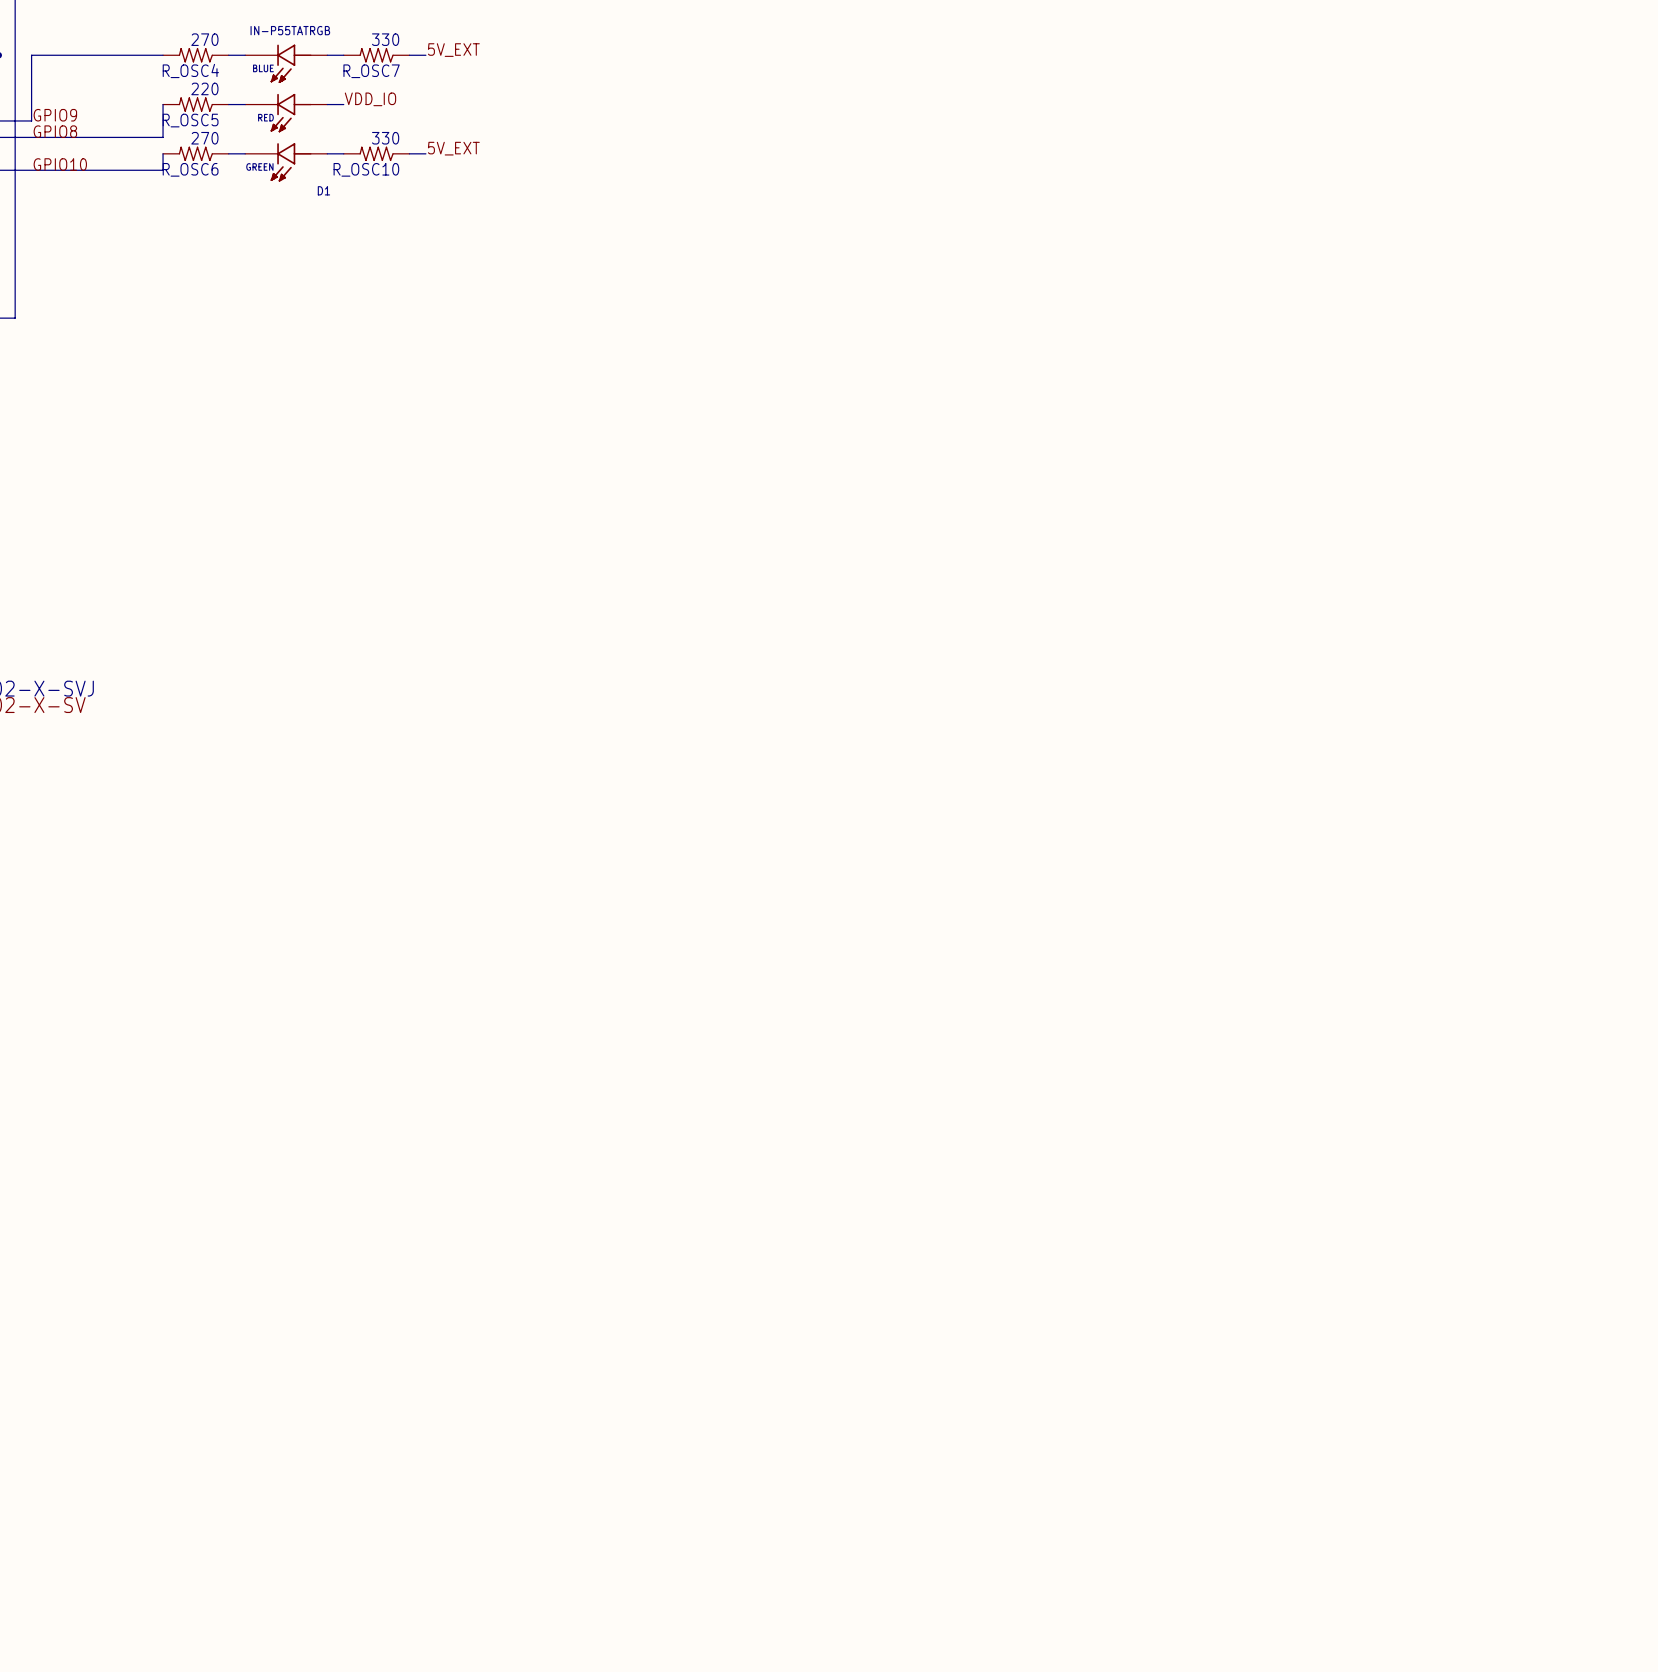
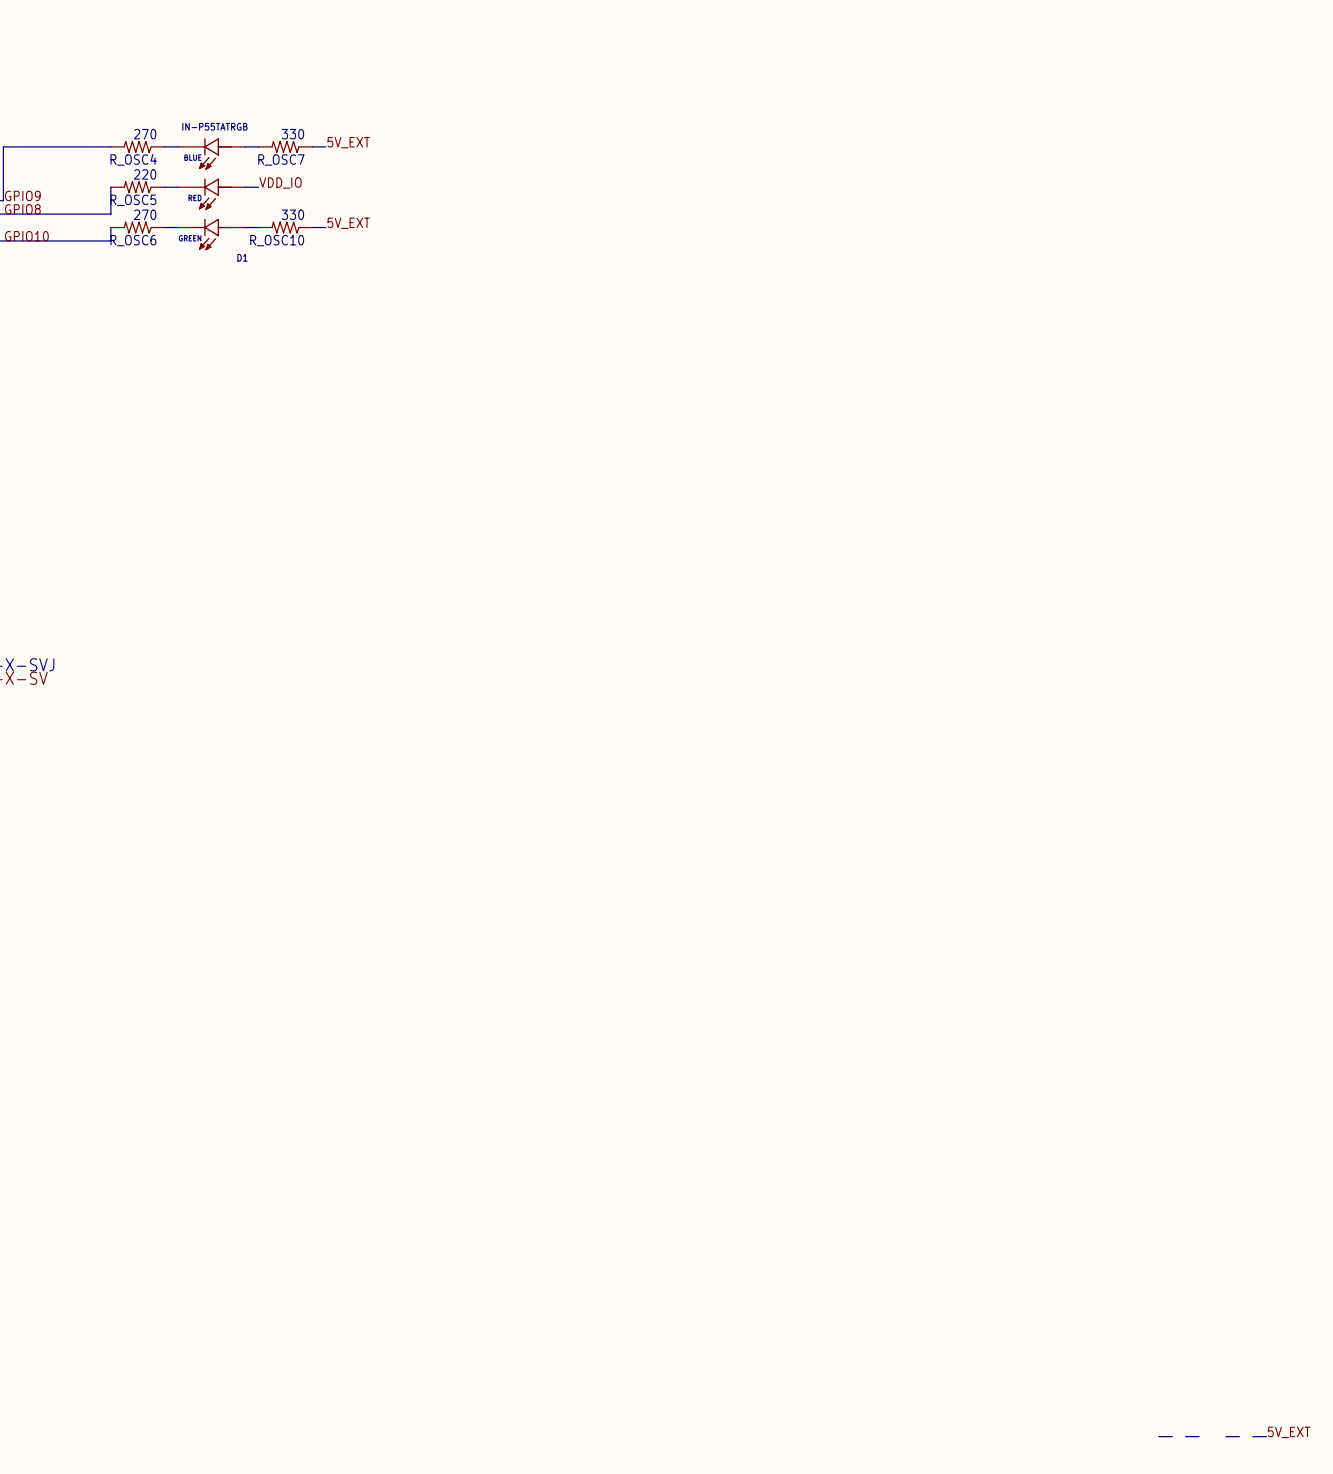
label: none -> 5V_EXT (1289, 1432)
wire: none -> (1158, 1436) (1172, 1436)
wire: none -> (1185, 1436) (1199, 1436)
wire: none -> (1225, 1436) (1239, 1436)
wire: none -> (1252, 1436) (1266, 1436)

